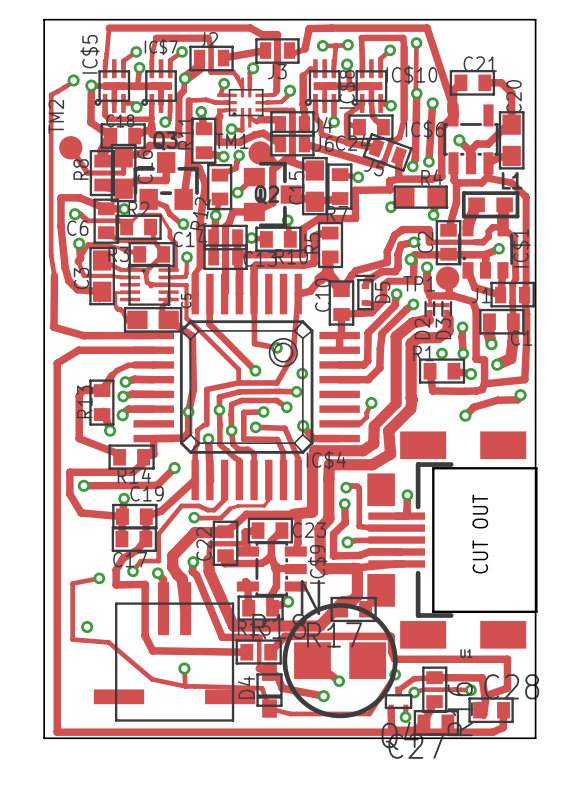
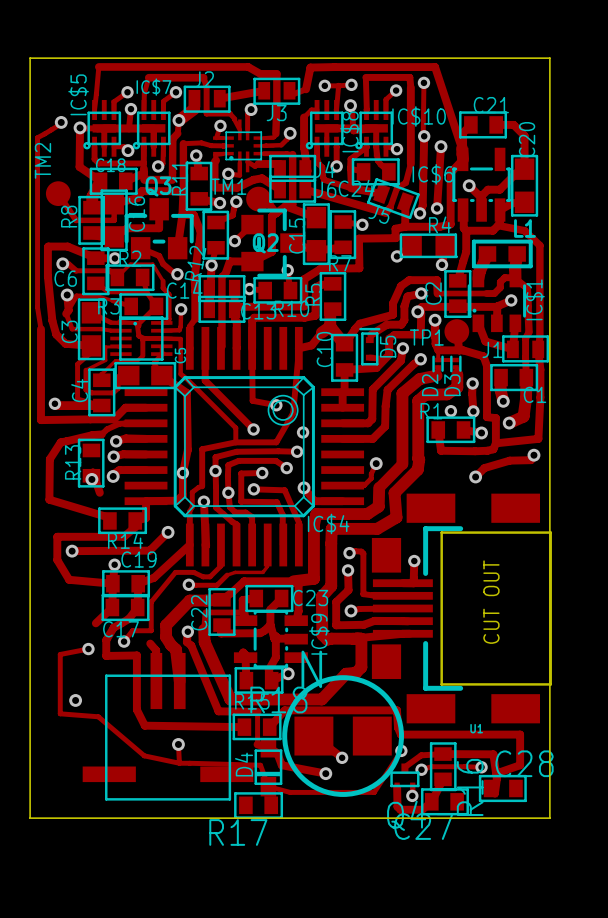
track: (54, 275) (53, 327) (83, 335) (153, 335) -> (40, 329) (40, 420) (114, 419) (125, 407)
track: none -> (142, 340) (142, 355) (137, 360) (115, 360) (101, 374) (101, 380)
track: none -> (88, 354) (77, 364) (77, 399) (101, 405) (55, 404)
track: (115, 305) (123, 312) (127, 321) -> (105, 360) (85, 370) (85, 389) (91, 392) (113, 392) (118, 388) (118, 377)
C4: none -> (101, 392)
via: none -> (54, 403)
track: (134, 350) (78, 350) (57, 363) (57, 732) (492, 732) (503, 727) (503, 710) -> none
track: (111, 375) (102, 390) (82, 390) (79, 396) (79, 438) (119, 454) -> (101, 434) (60, 442) (49, 459) (49, 499) (109, 517)
via position: (110, 430) -> (91, 479)
track: none -> (112, 607) (95, 623)
via: (157, 573) -> none
R17 position: (353, 609) -> (258, 805)

